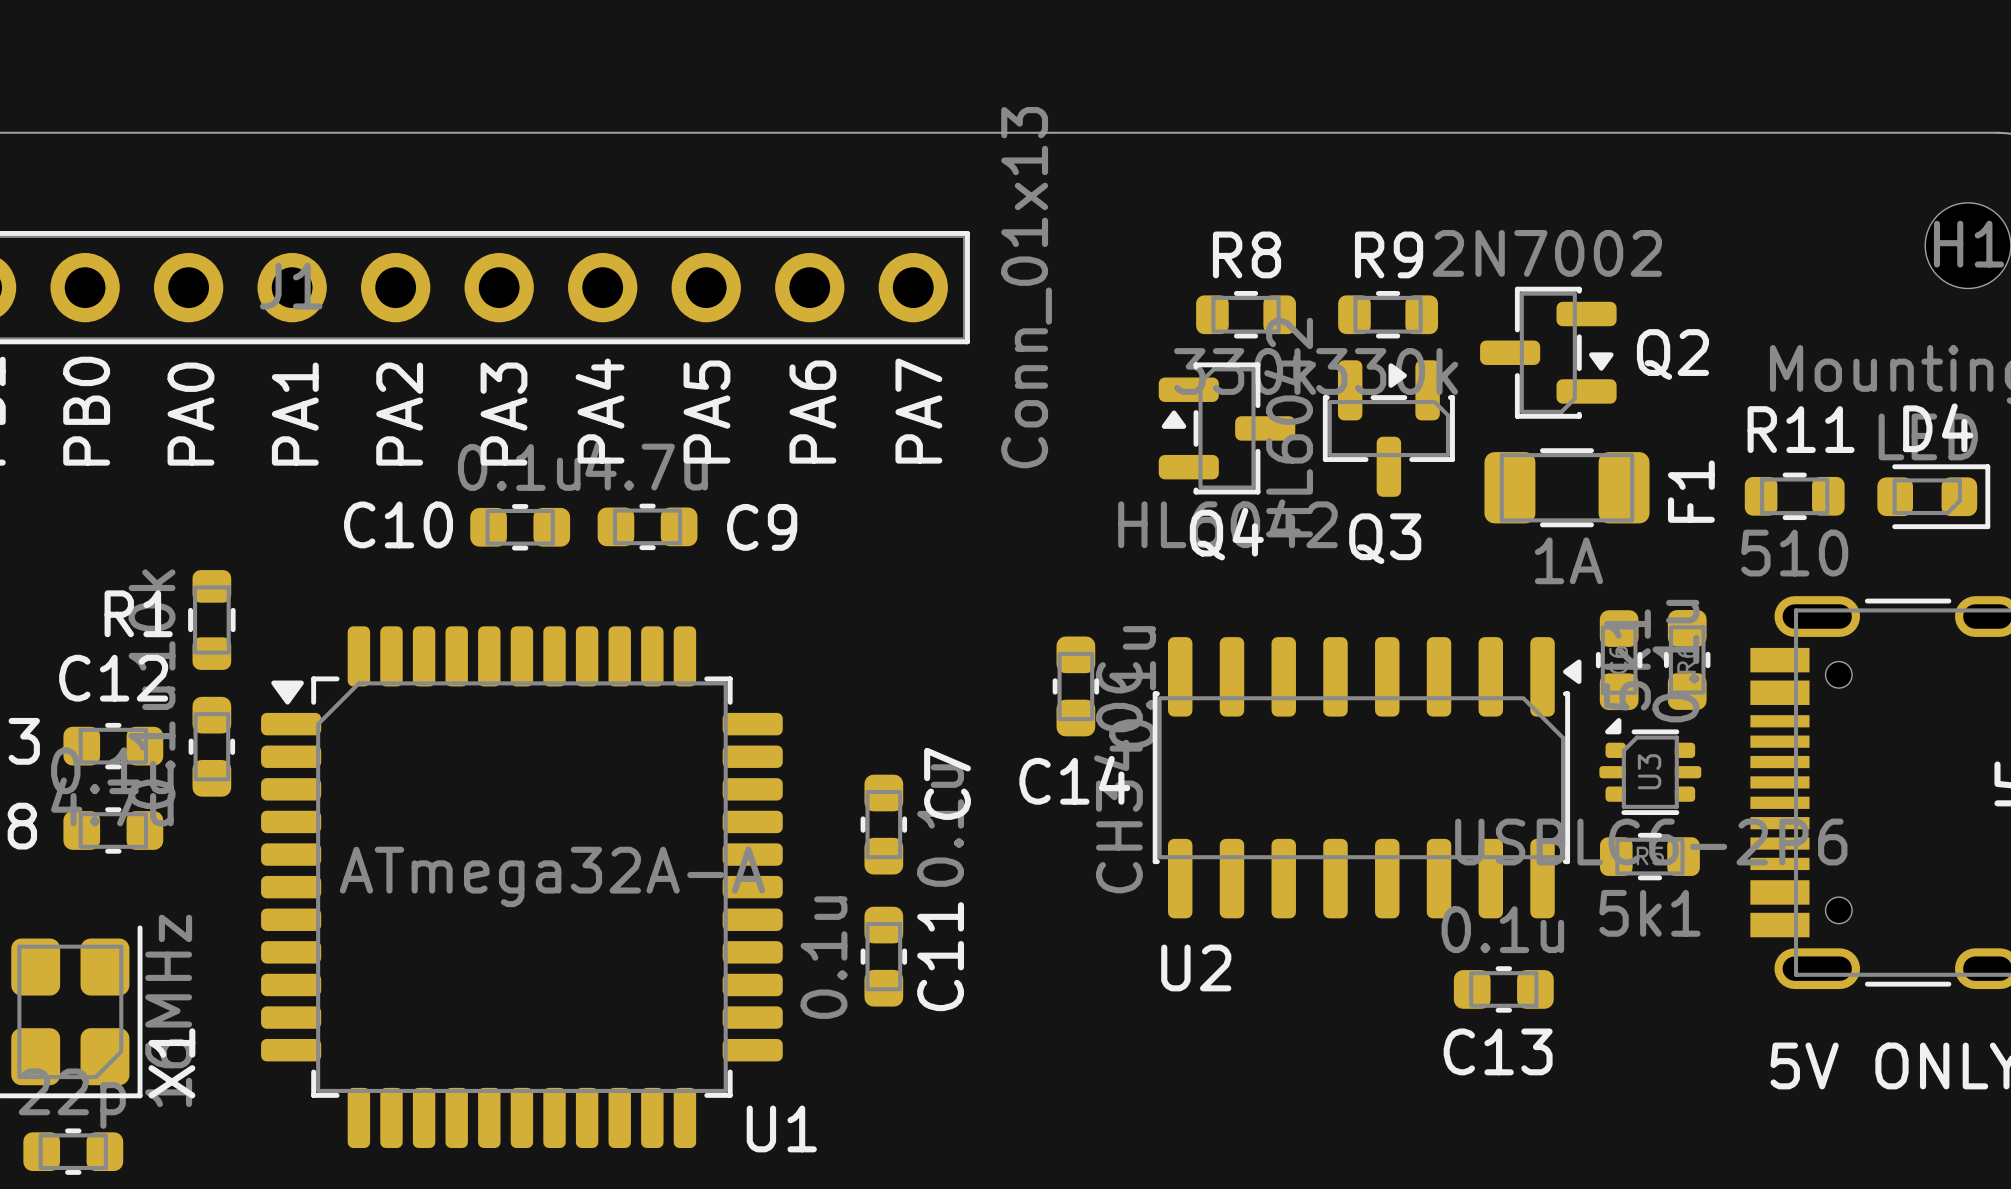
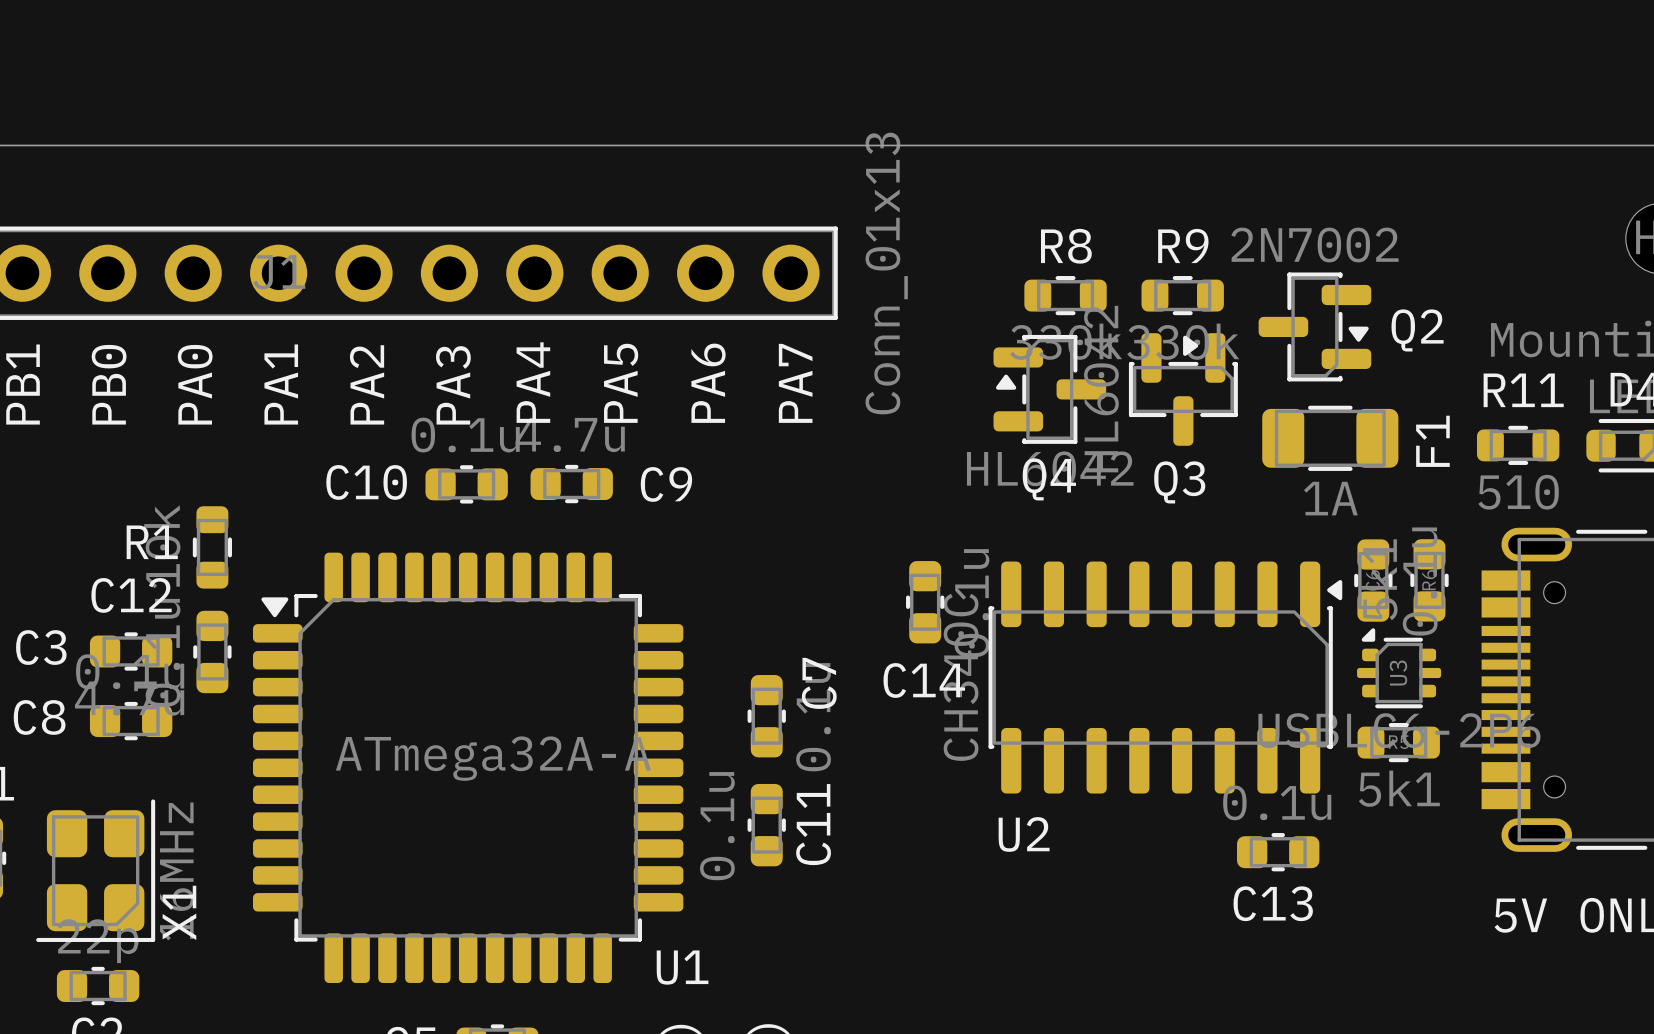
C9 position: (647, 526) -> (571, 484)
C10 position: (520, 527) -> (466, 484)

